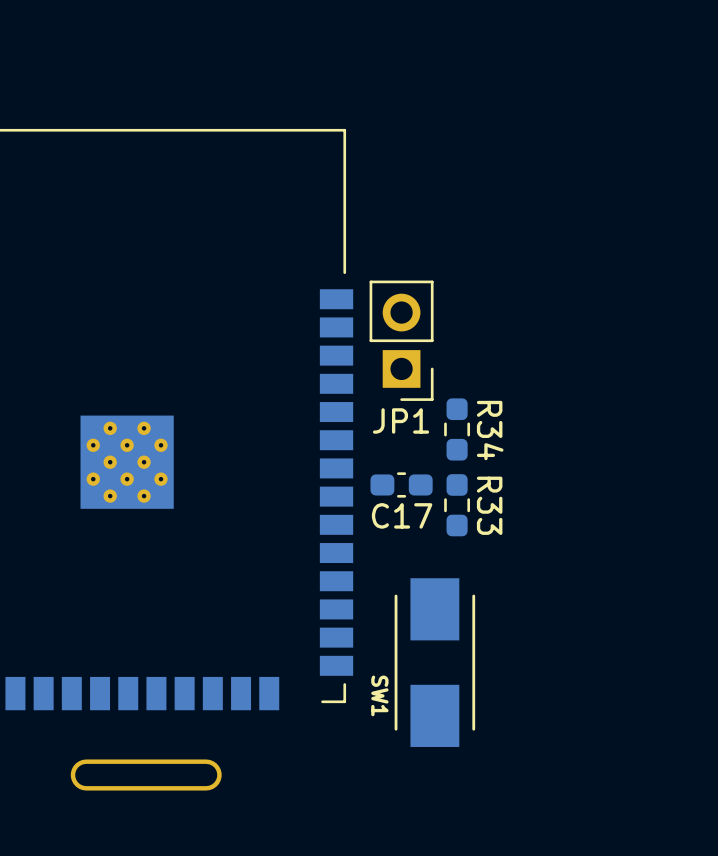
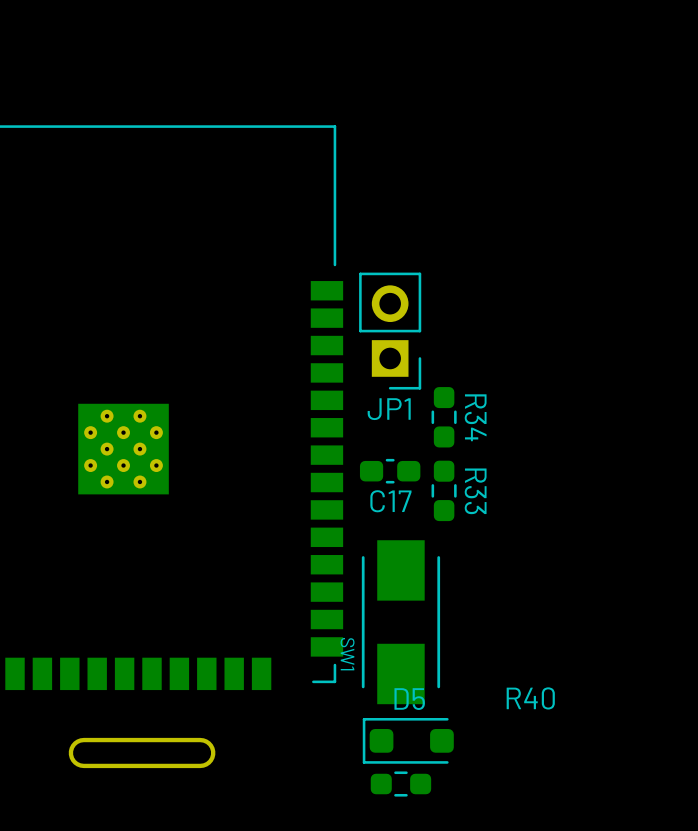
SW1 position: (434, 662) -> (400, 622)
D5: none -> (408, 740)
R40: none -> (400, 784)

